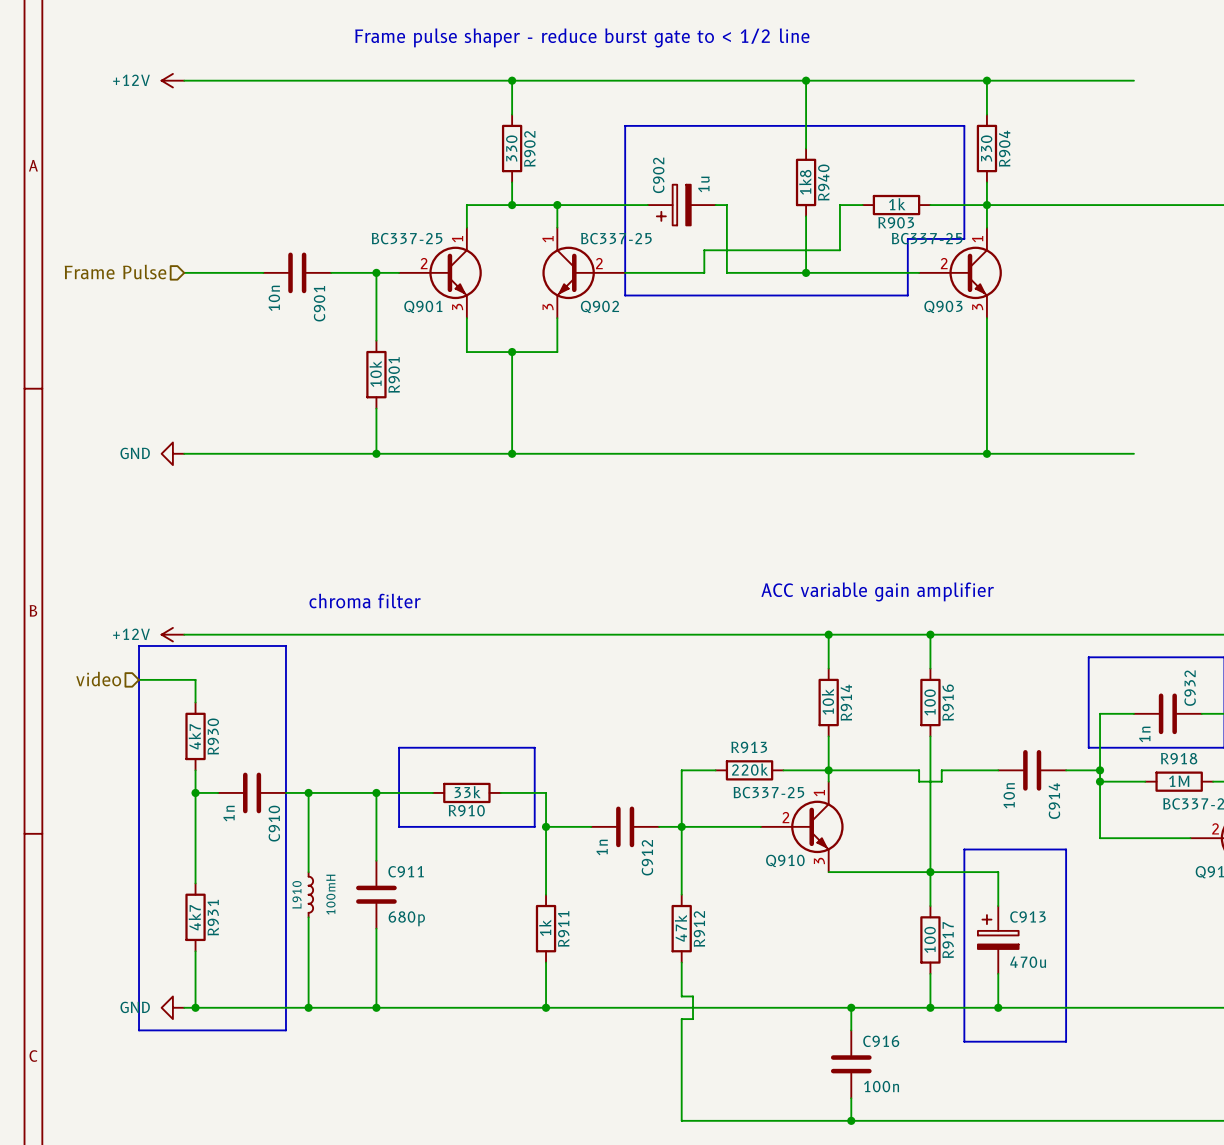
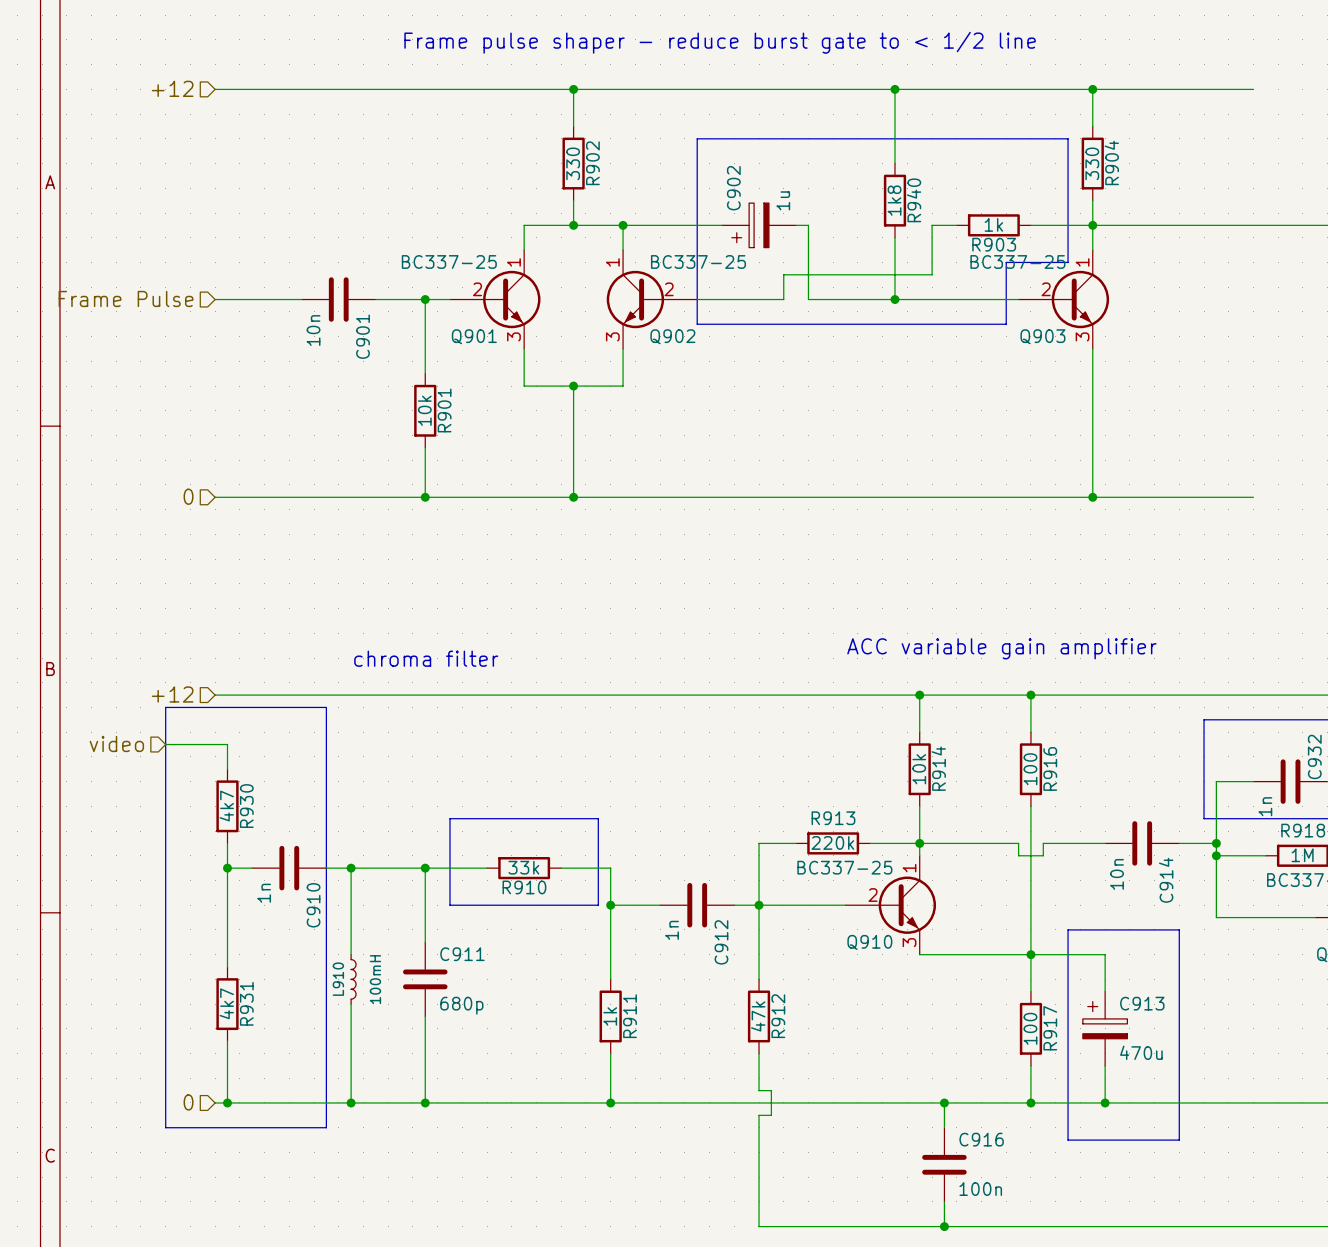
hierarchical label: none -> +12 (172, 88)
power symbol: +12V (172, 80) -> none
hierarchical label: none -> 0 (188, 496)
power symbol: GND (172, 453) -> none
hierarchical label: none -> +12 (172, 694)
power symbol: +12V (172, 634) -> none
hierarchical label: none -> 0 (188, 1102)
power symbol: GND (172, 1007) -> none

